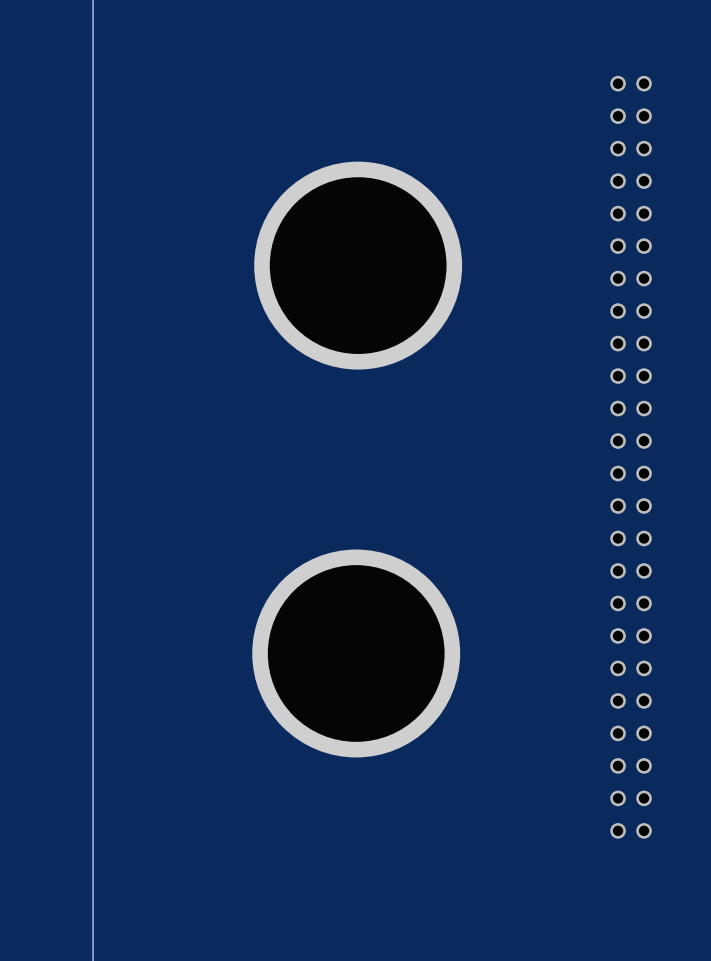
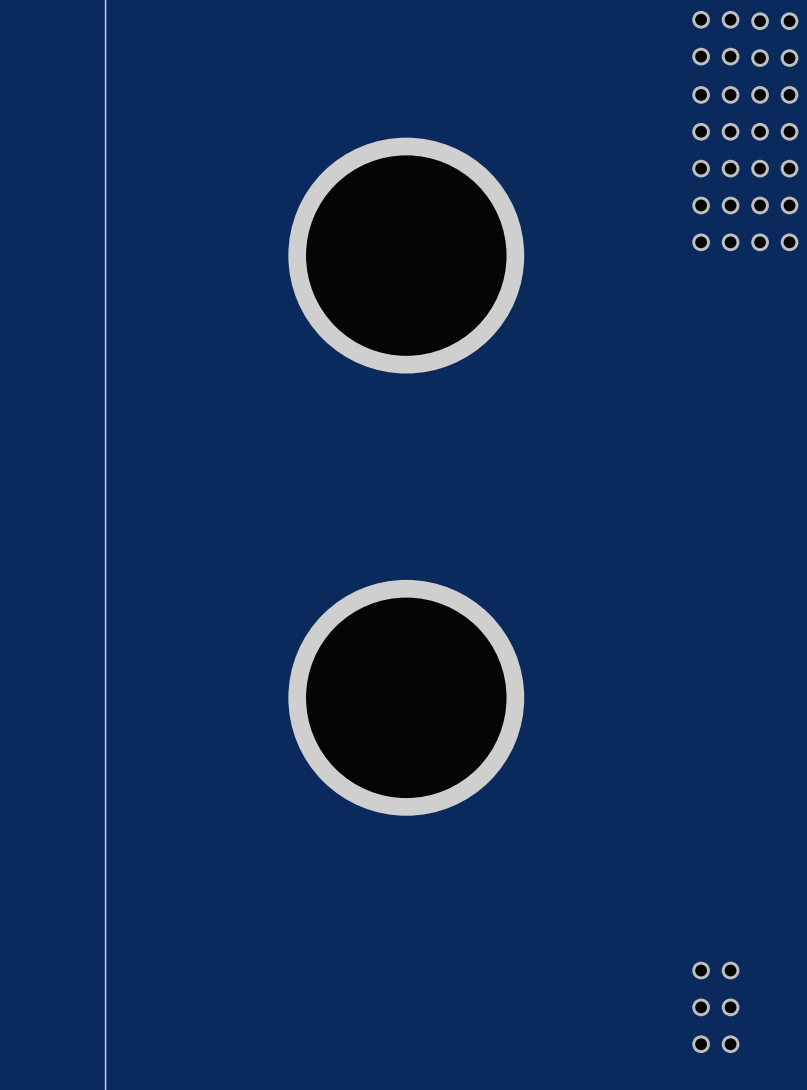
via: none -> (701, 19)
via: none -> (730, 19)
via: none -> (760, 21)
via: none -> (789, 21)
via: none -> (701, 56)
via: none -> (730, 56)
via: none -> (760, 58)
via: none -> (789, 58)
via: none -> (760, 94)
via: none -> (789, 94)
via: none -> (760, 131)
via: none -> (789, 131)
via: none -> (760, 168)
via: none -> (789, 168)
via: none -> (760, 205)
via: none -> (789, 205)
via: none -> (760, 242)
via: none -> (789, 242)
via: (618, 246) -> none
via: (644, 246) -> none
part position: (358, 265) -> (406, 255)
via: (618, 278) -> none
via: (644, 278) -> none
via: (618, 311) -> none
via: (644, 311) -> none
via: (618, 343) -> none
via: (644, 343) -> none
via: (618, 376) -> none
via: (644, 376) -> none
via: (618, 408) -> none
via: (644, 408) -> none
via: (618, 441) -> none
via: (644, 441) -> none
via: (618, 473) -> none
via: (644, 473) -> none
via: (618, 506) -> none
via: (644, 506) -> none
via: (618, 538) -> none
via: (644, 538) -> none
via: (618, 570) -> none
via: (644, 570) -> none
via: (618, 603) -> none
via: (644, 603) -> none
via: (618, 635) -> none
via: (644, 635) -> none
part position: (356, 653) -> (406, 697)
via: (618, 668) -> none
via: (644, 668) -> none
via: (618, 700) -> none
via: (644, 700) -> none
via: (618, 733) -> none
via: (644, 733) -> none
via: (618, 765) -> none
via: (644, 765) -> none
via: (618, 798) -> none
via: (644, 798) -> none
via: (618, 830) -> none
via: (644, 830) -> none
via: none -> (701, 970)
via: none -> (730, 970)
via: none -> (701, 1007)
via: none -> (730, 1007)
via: none -> (701, 1044)
via: none -> (730, 1044)

